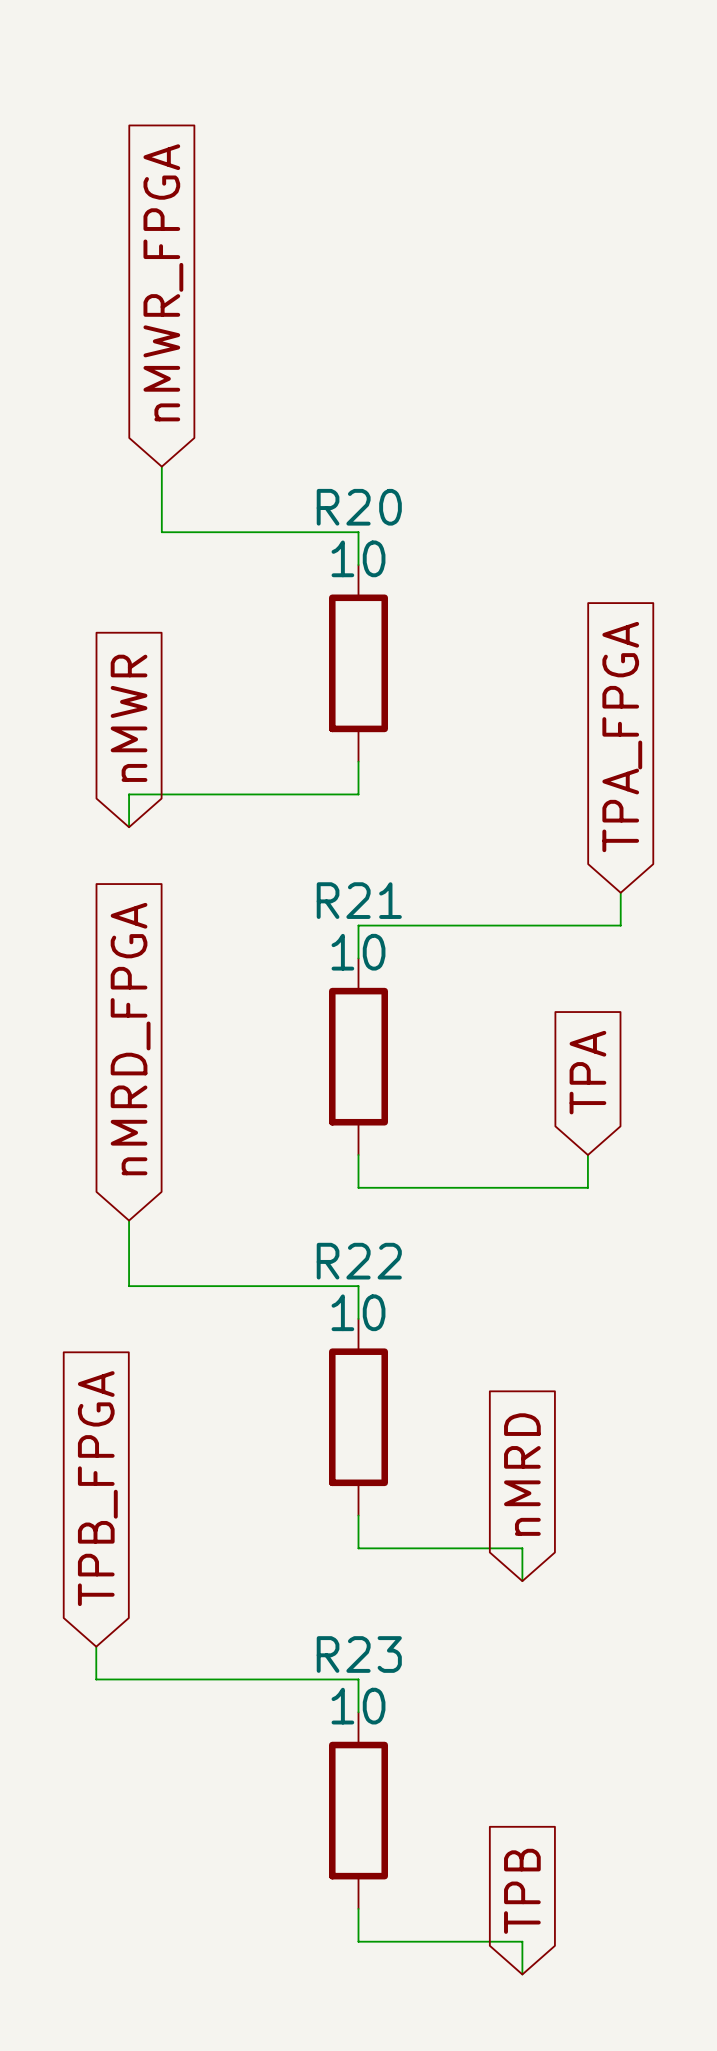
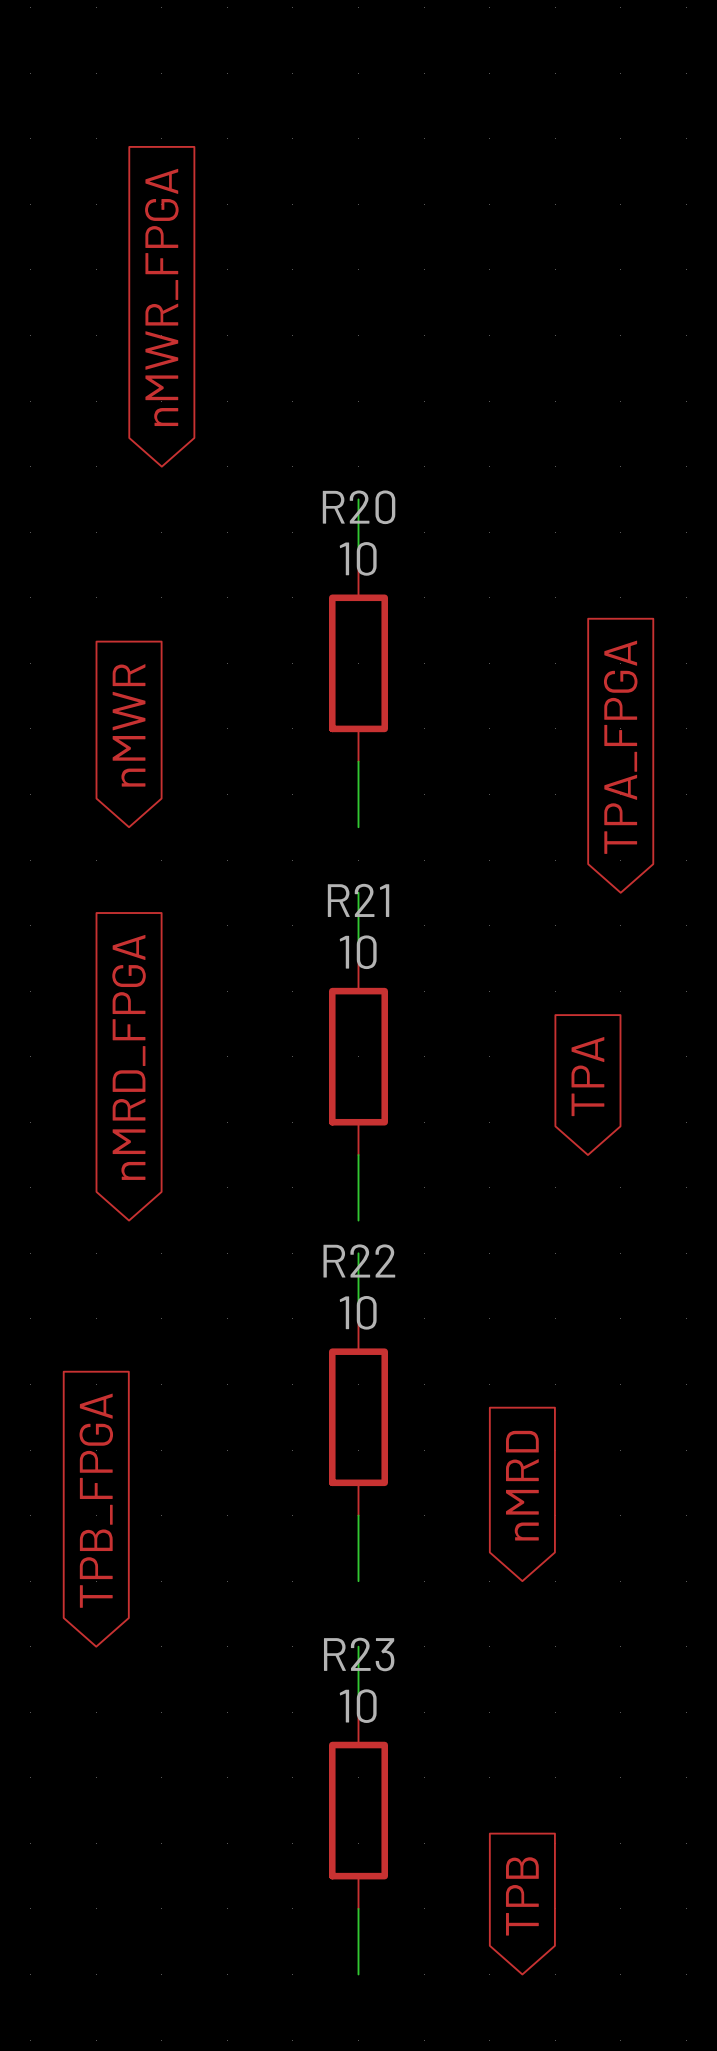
wire: (161, 466) (161, 532) (358, 532) -> (358, 499) (358, 532)
wire: (358, 794) (129, 794) (129, 827) -> (358, 794) (358, 827)
wire: (620, 892) (620, 925) (358, 925) -> (358, 892) (358, 925)
wire: (587, 1155) (587, 1187) (358, 1187) -> (358, 1220) (358, 1187)
wire: (129, 1220) (129, 1286) (358, 1286) -> (358, 1253) (358, 1286)
wire: (358, 1548) (522, 1548) (522, 1581) -> (358, 1548) (358, 1581)
wire: (96, 1646) (96, 1679) (358, 1679) -> (358, 1646) (358, 1679)
wire: (358, 1941) (522, 1941) (522, 1974) -> (358, 1941) (358, 1974)

